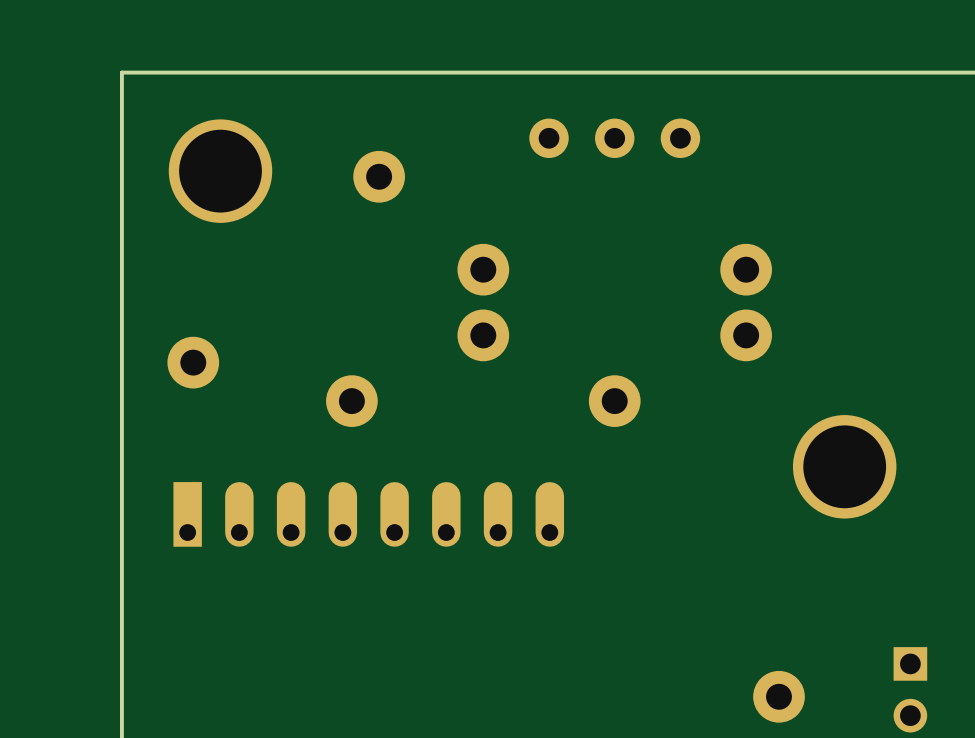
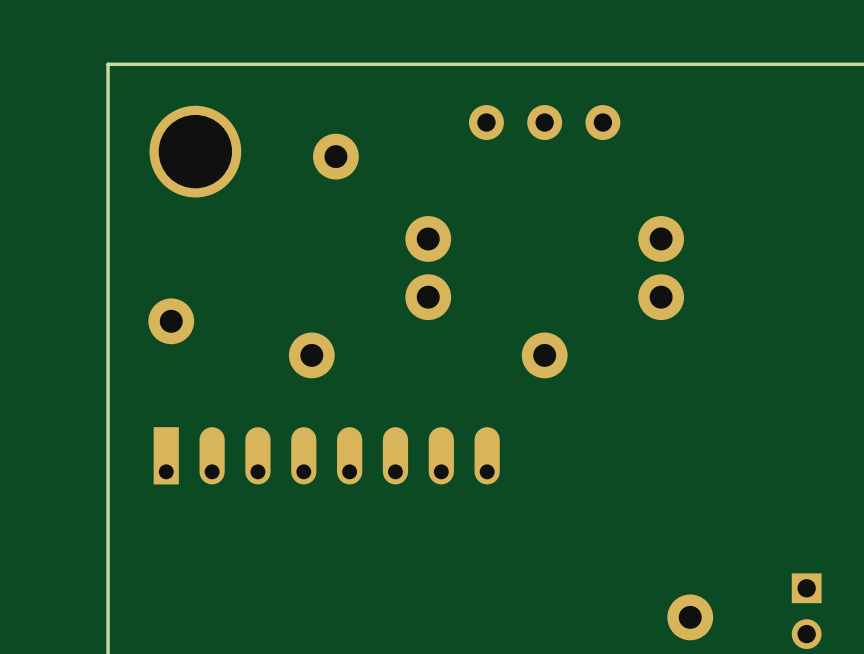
part: (844, 466) -> none

